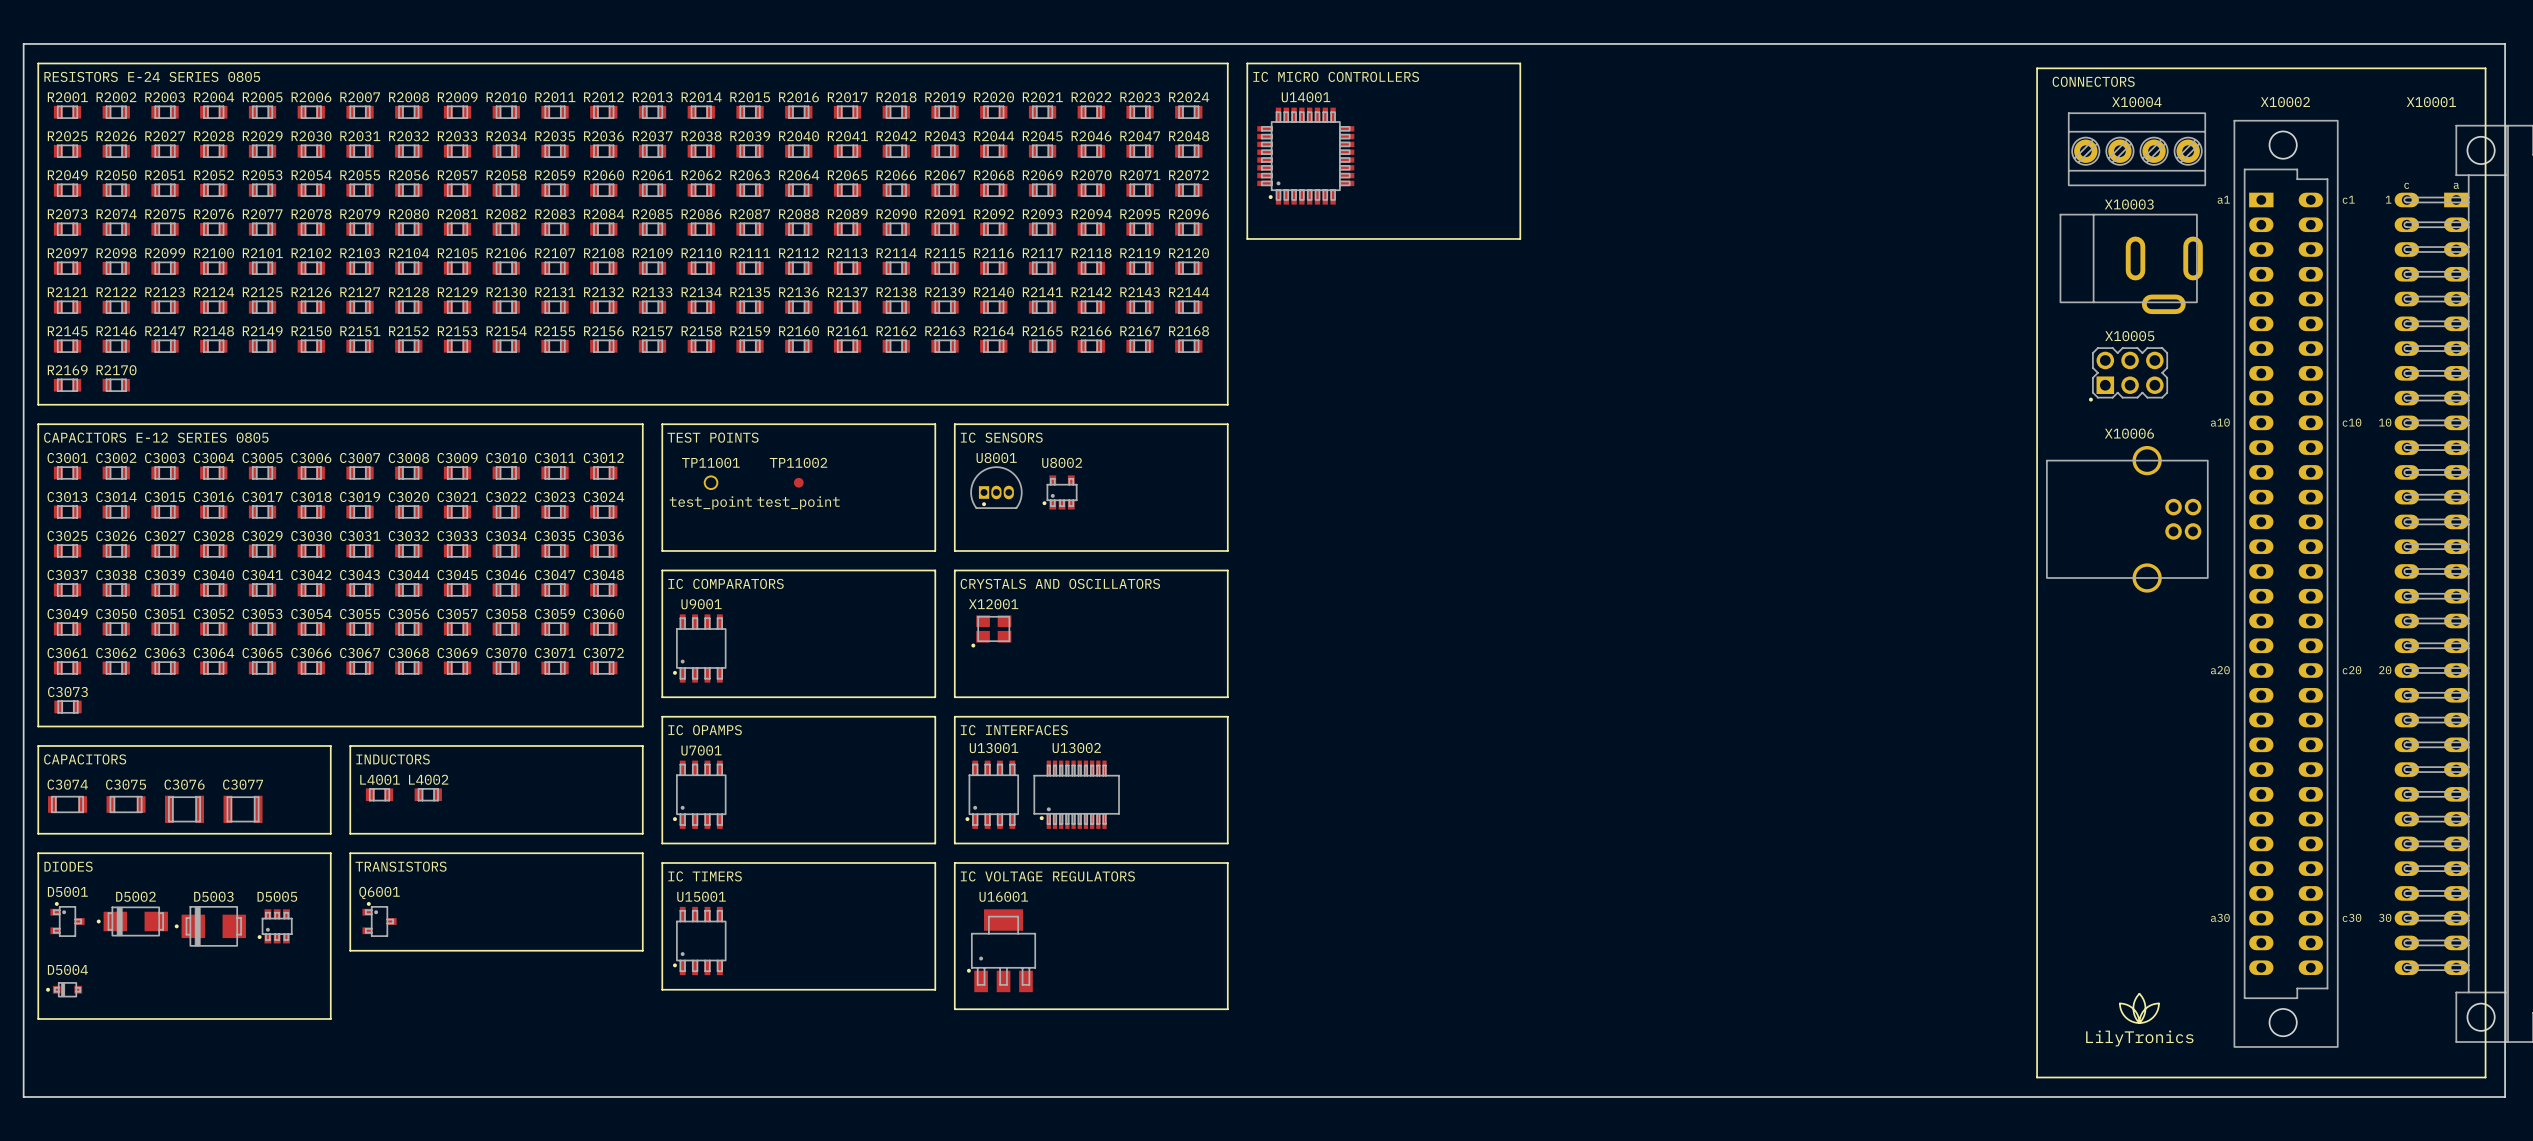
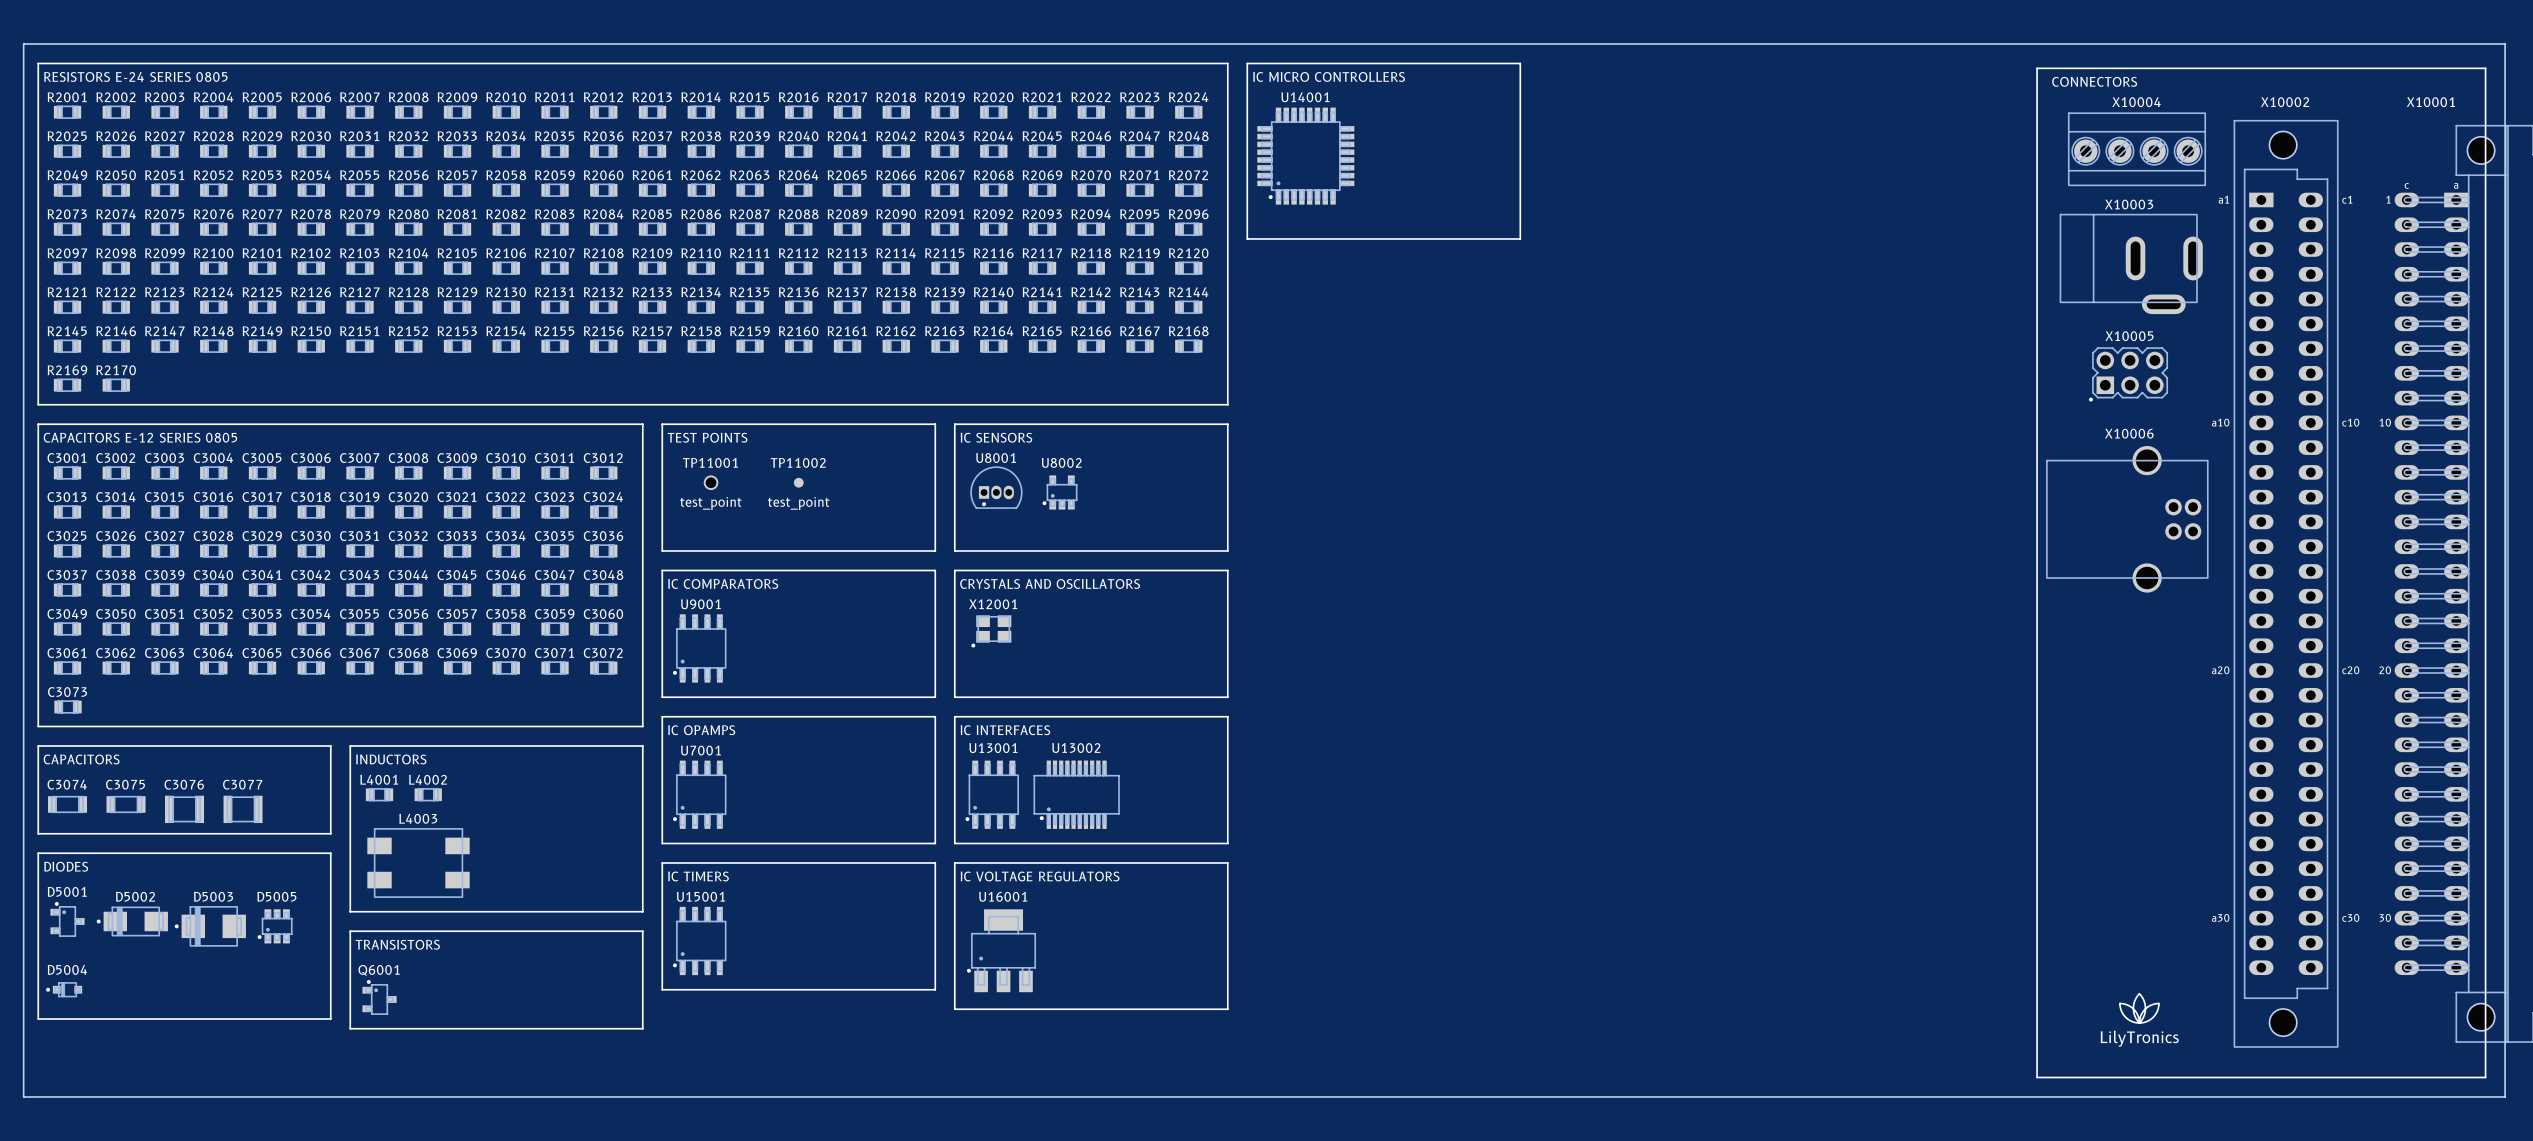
line: (350, 833) (642, 833) -> (350, 833) (350, 853)
line: (350, 853) (642, 853) -> (642, 833) (642, 853)
L4003: none -> (418, 862)
text position: TRANSISTORS (401, 866) -> TRANSISTORS (397, 944)
line: (350, 911) (350, 931) -> (350, 911) (642, 911)
line: (642, 911) (642, 931) -> (350, 931) (642, 931)
Q6001 position: (379, 919) -> (379, 997)
line: (350, 950) (642, 950) -> (350, 950) (350, 1028) (642, 1028) (642, 950)

